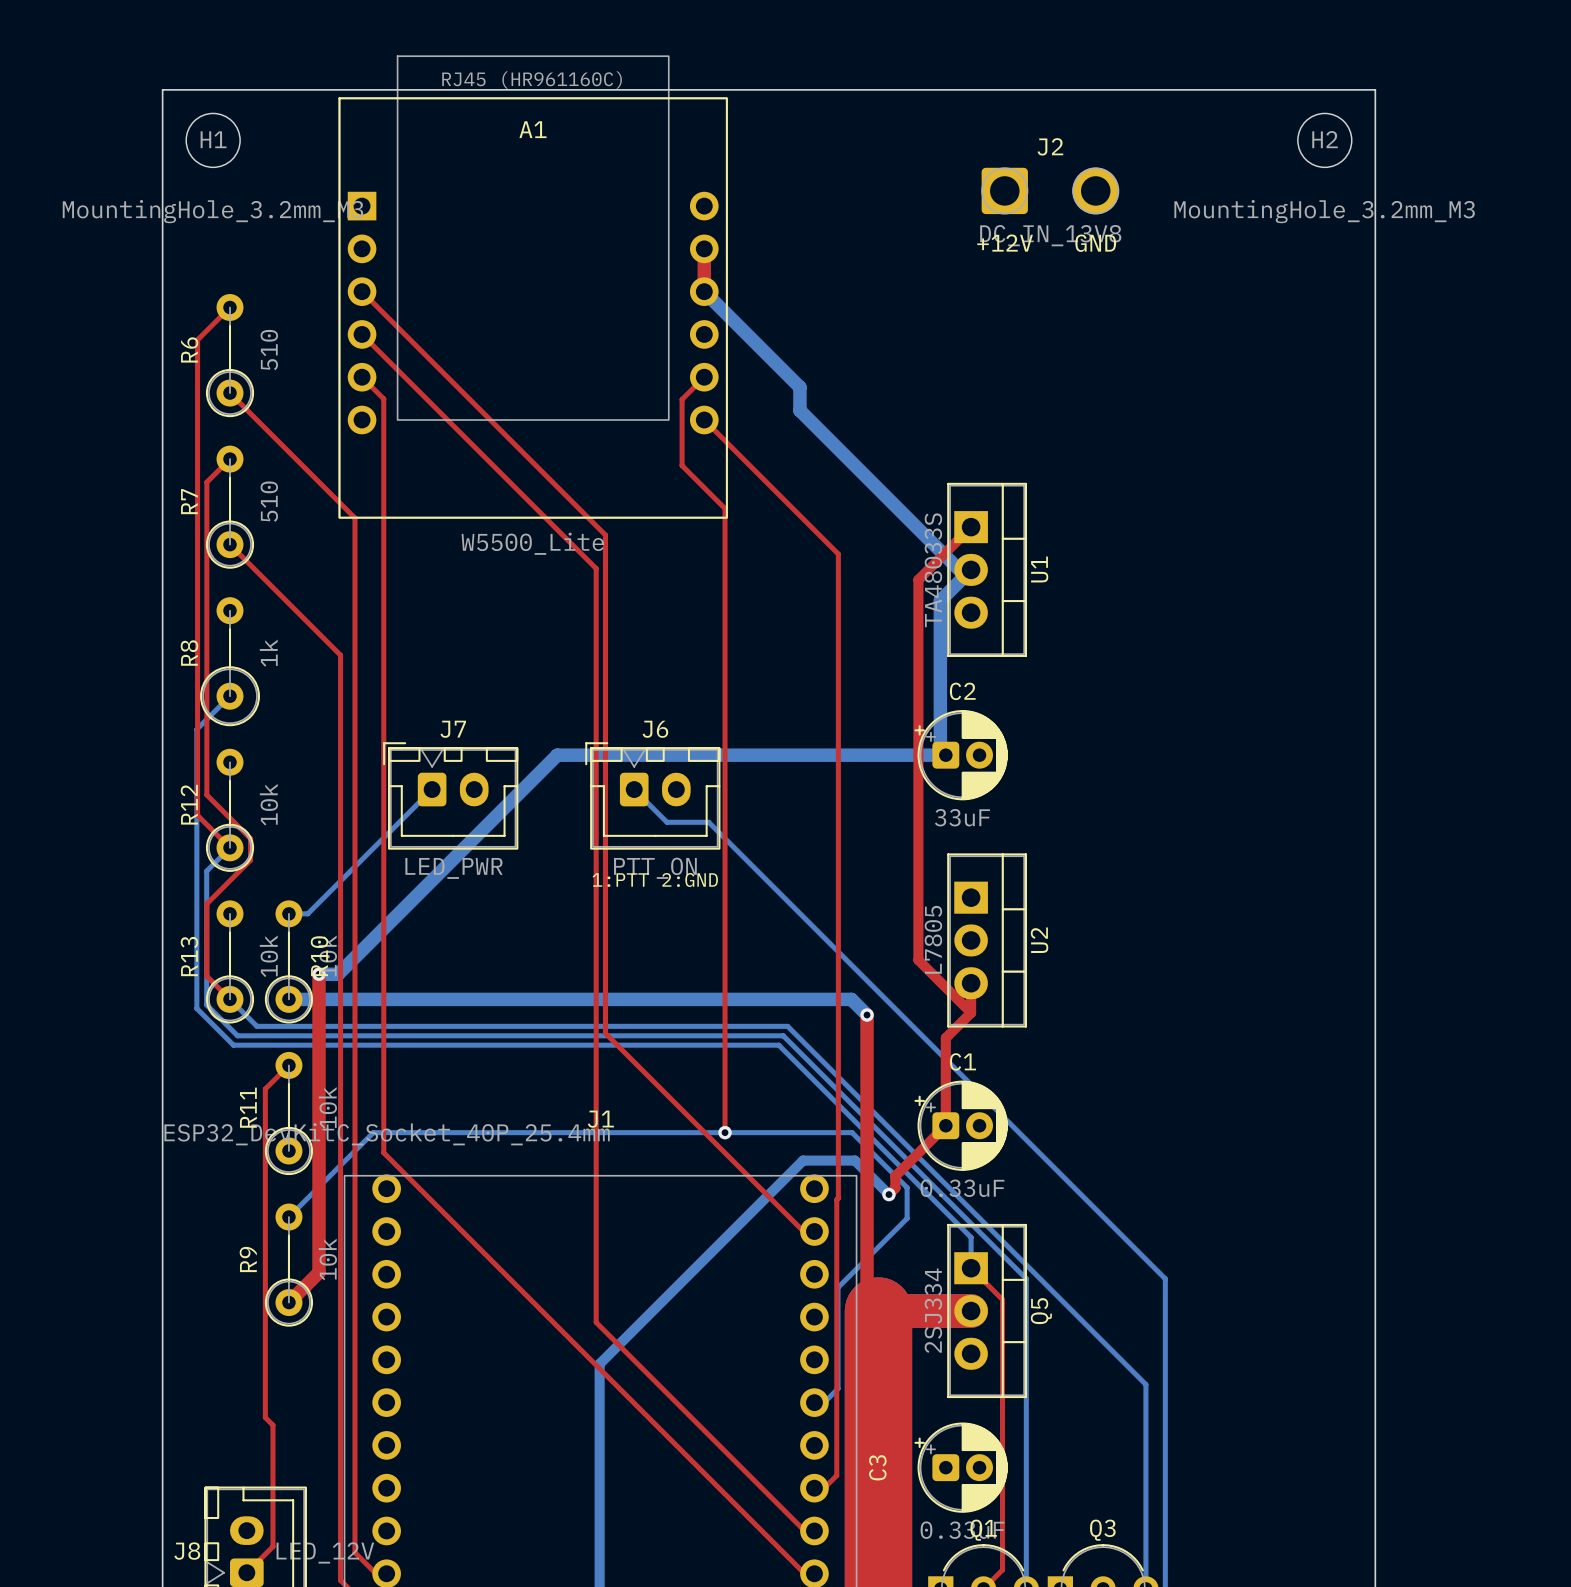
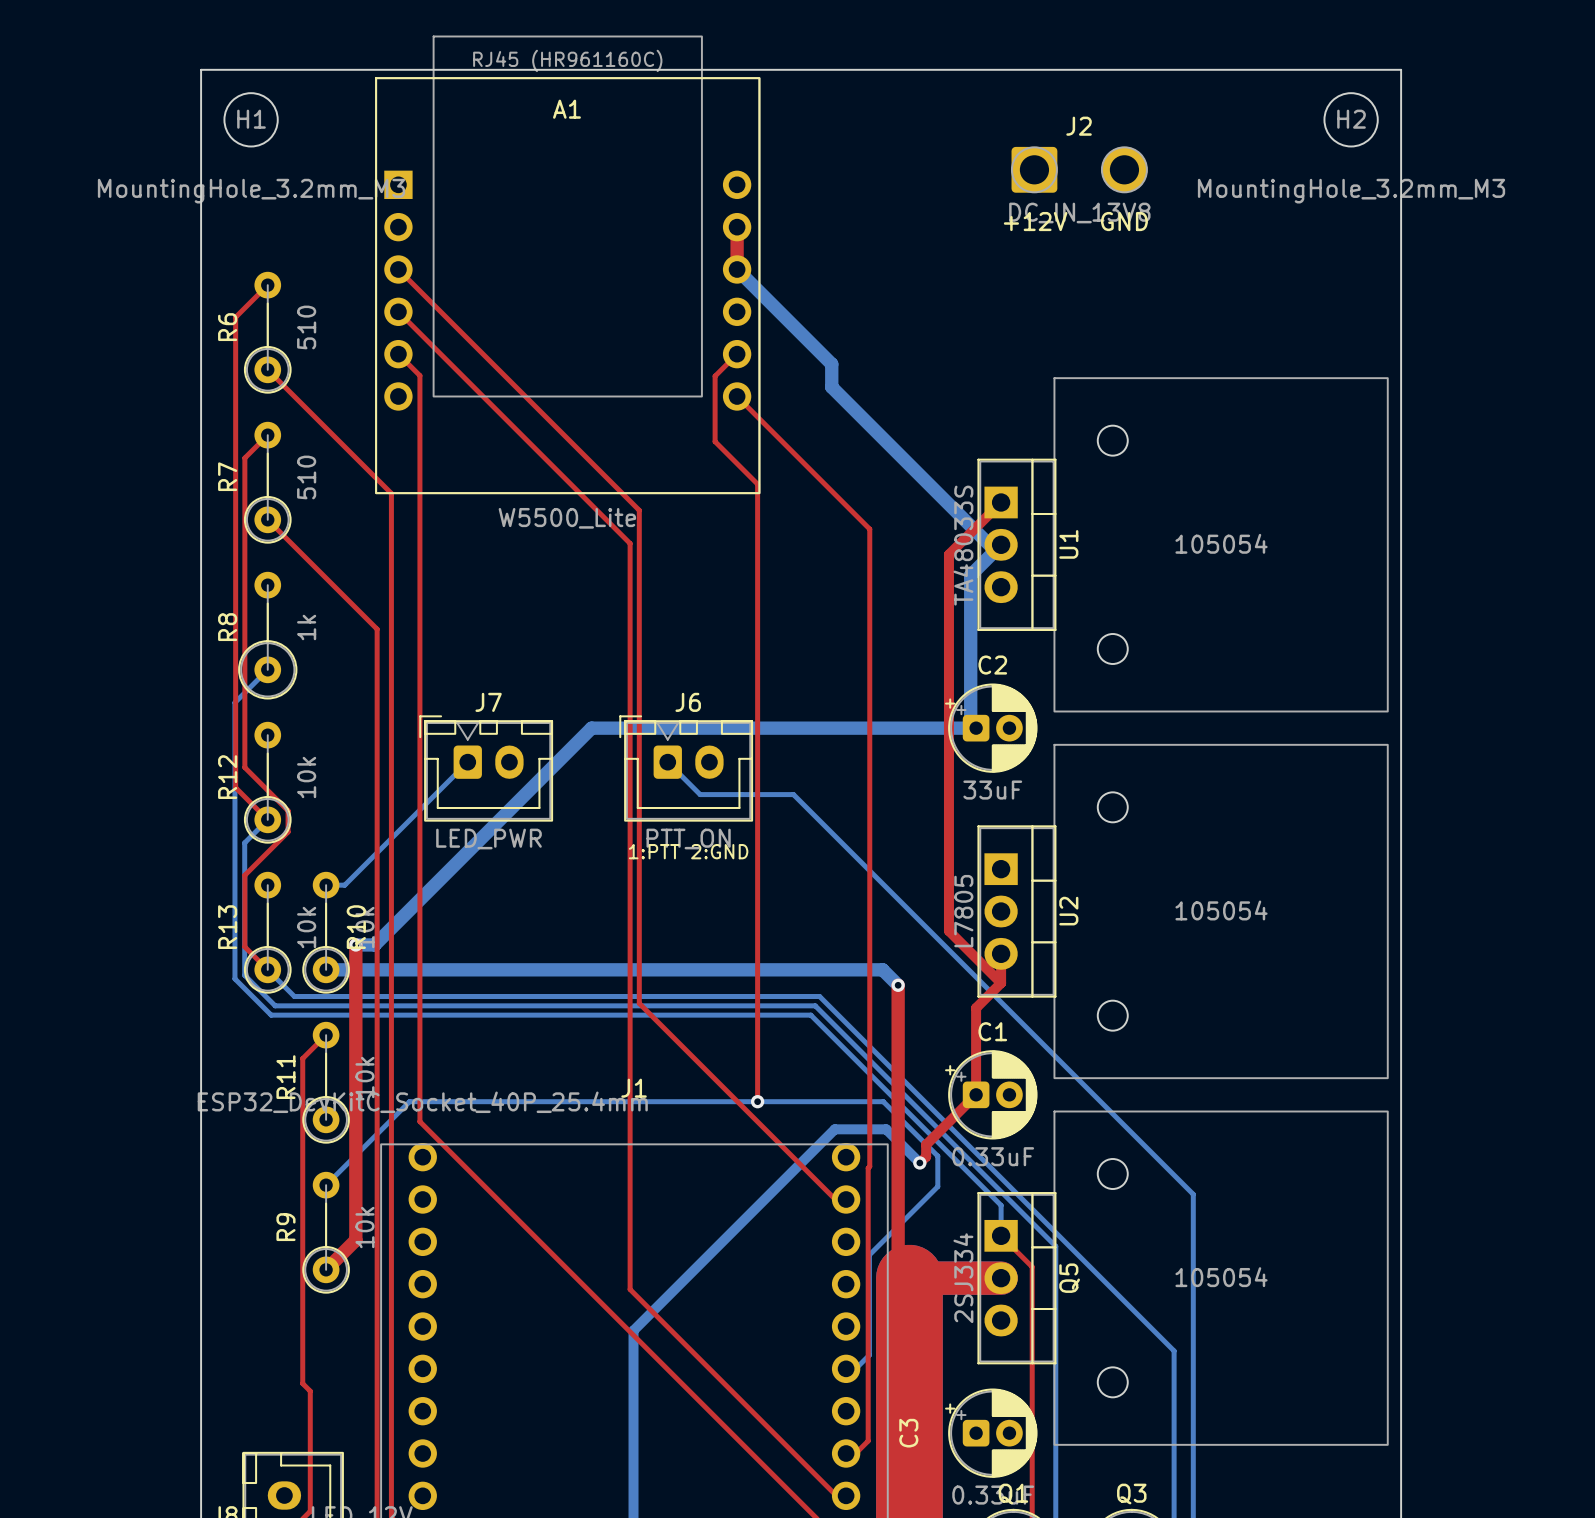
part: none -> 105054 (1221, 544)
bottom track: (708, 822) (1165, 1278) -> (741, 794) (793, 794) (1193, 1194) (1193, 1246)
part: none -> 105054 (1221, 911)
part: none -> 105054 (1221, 1278)

